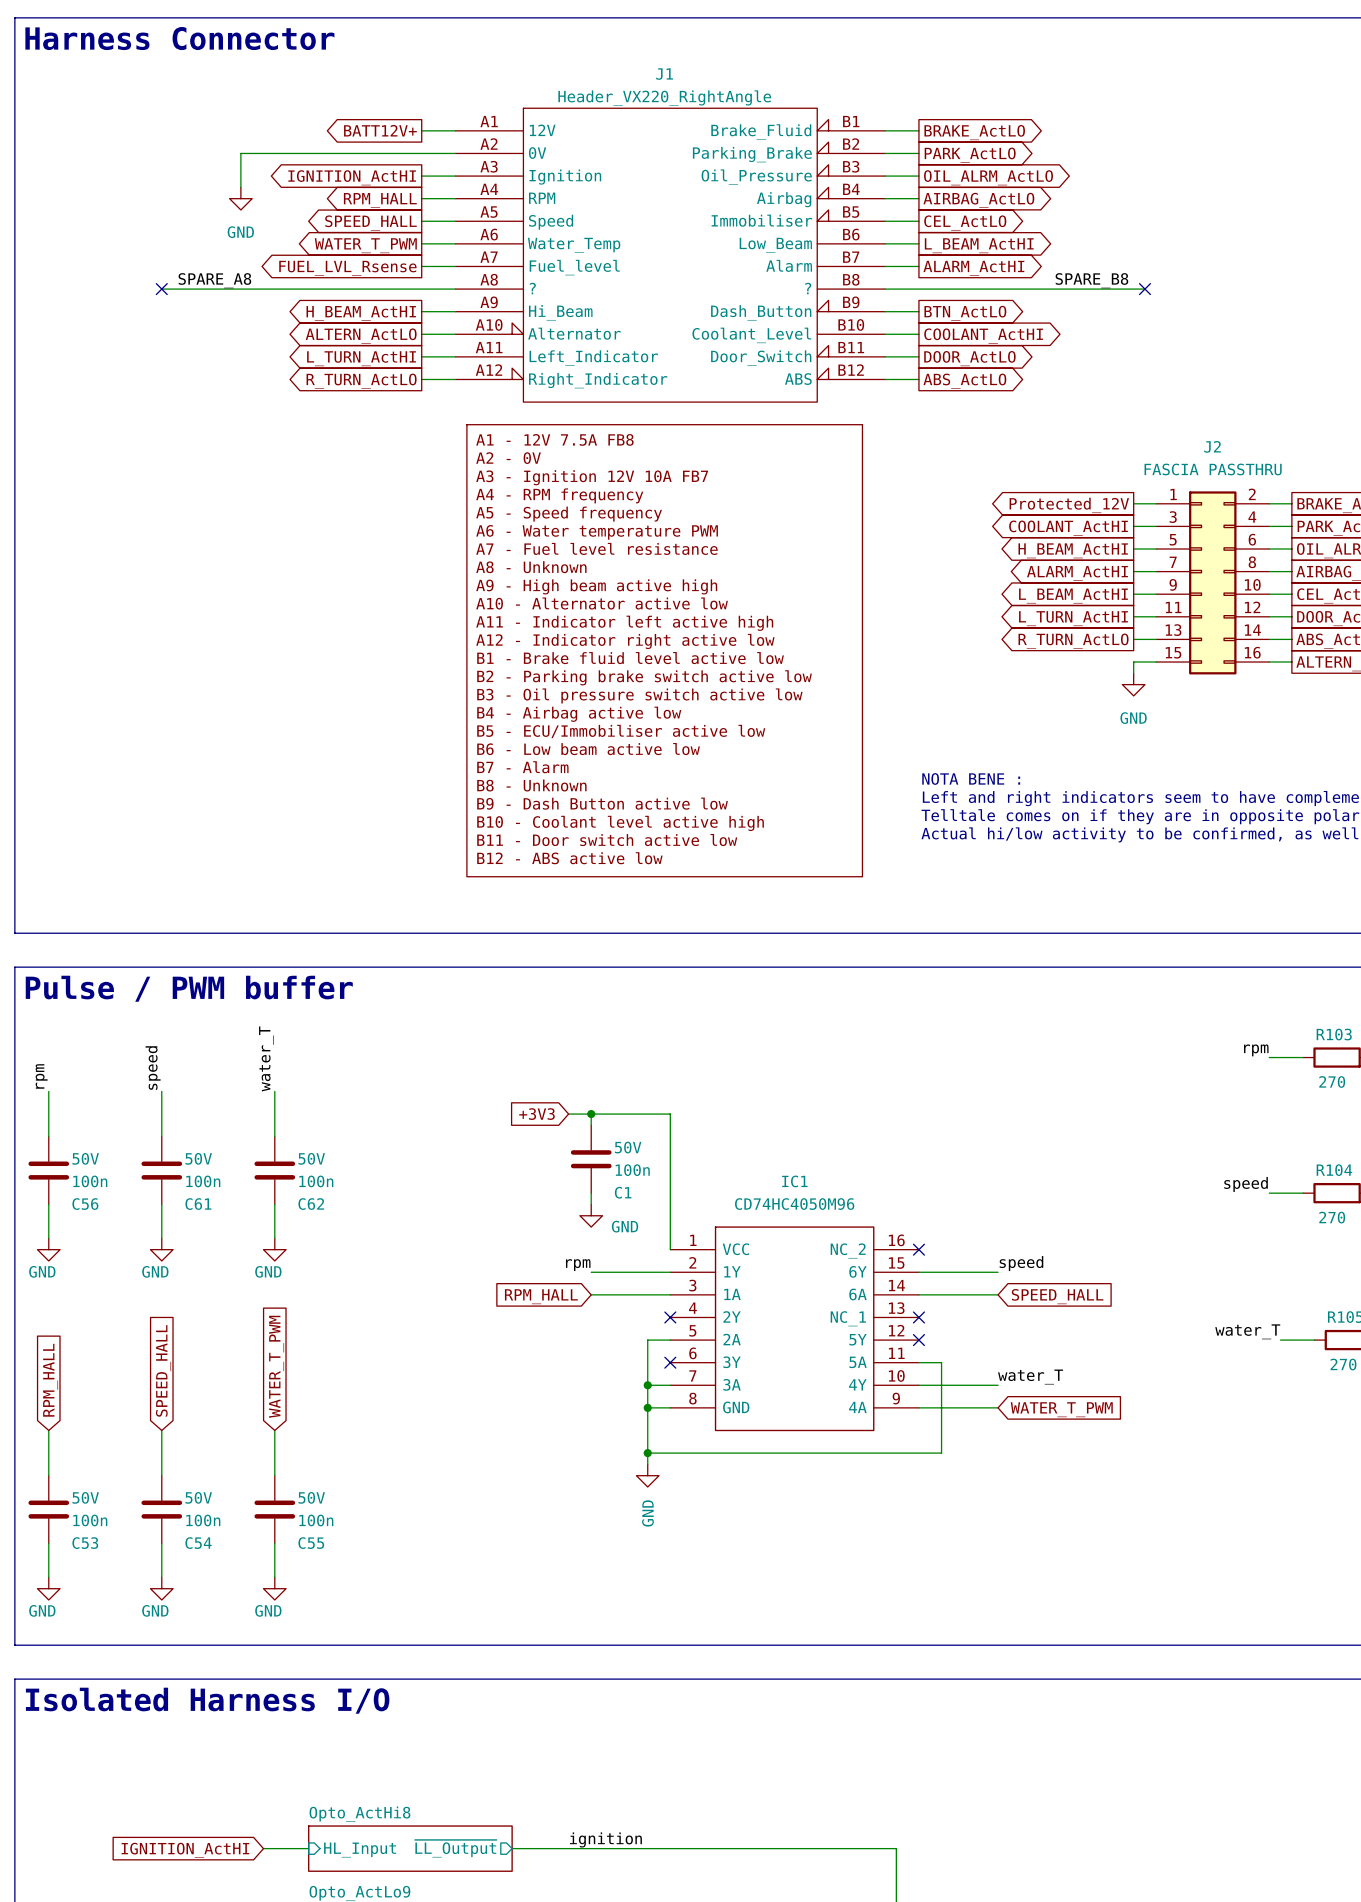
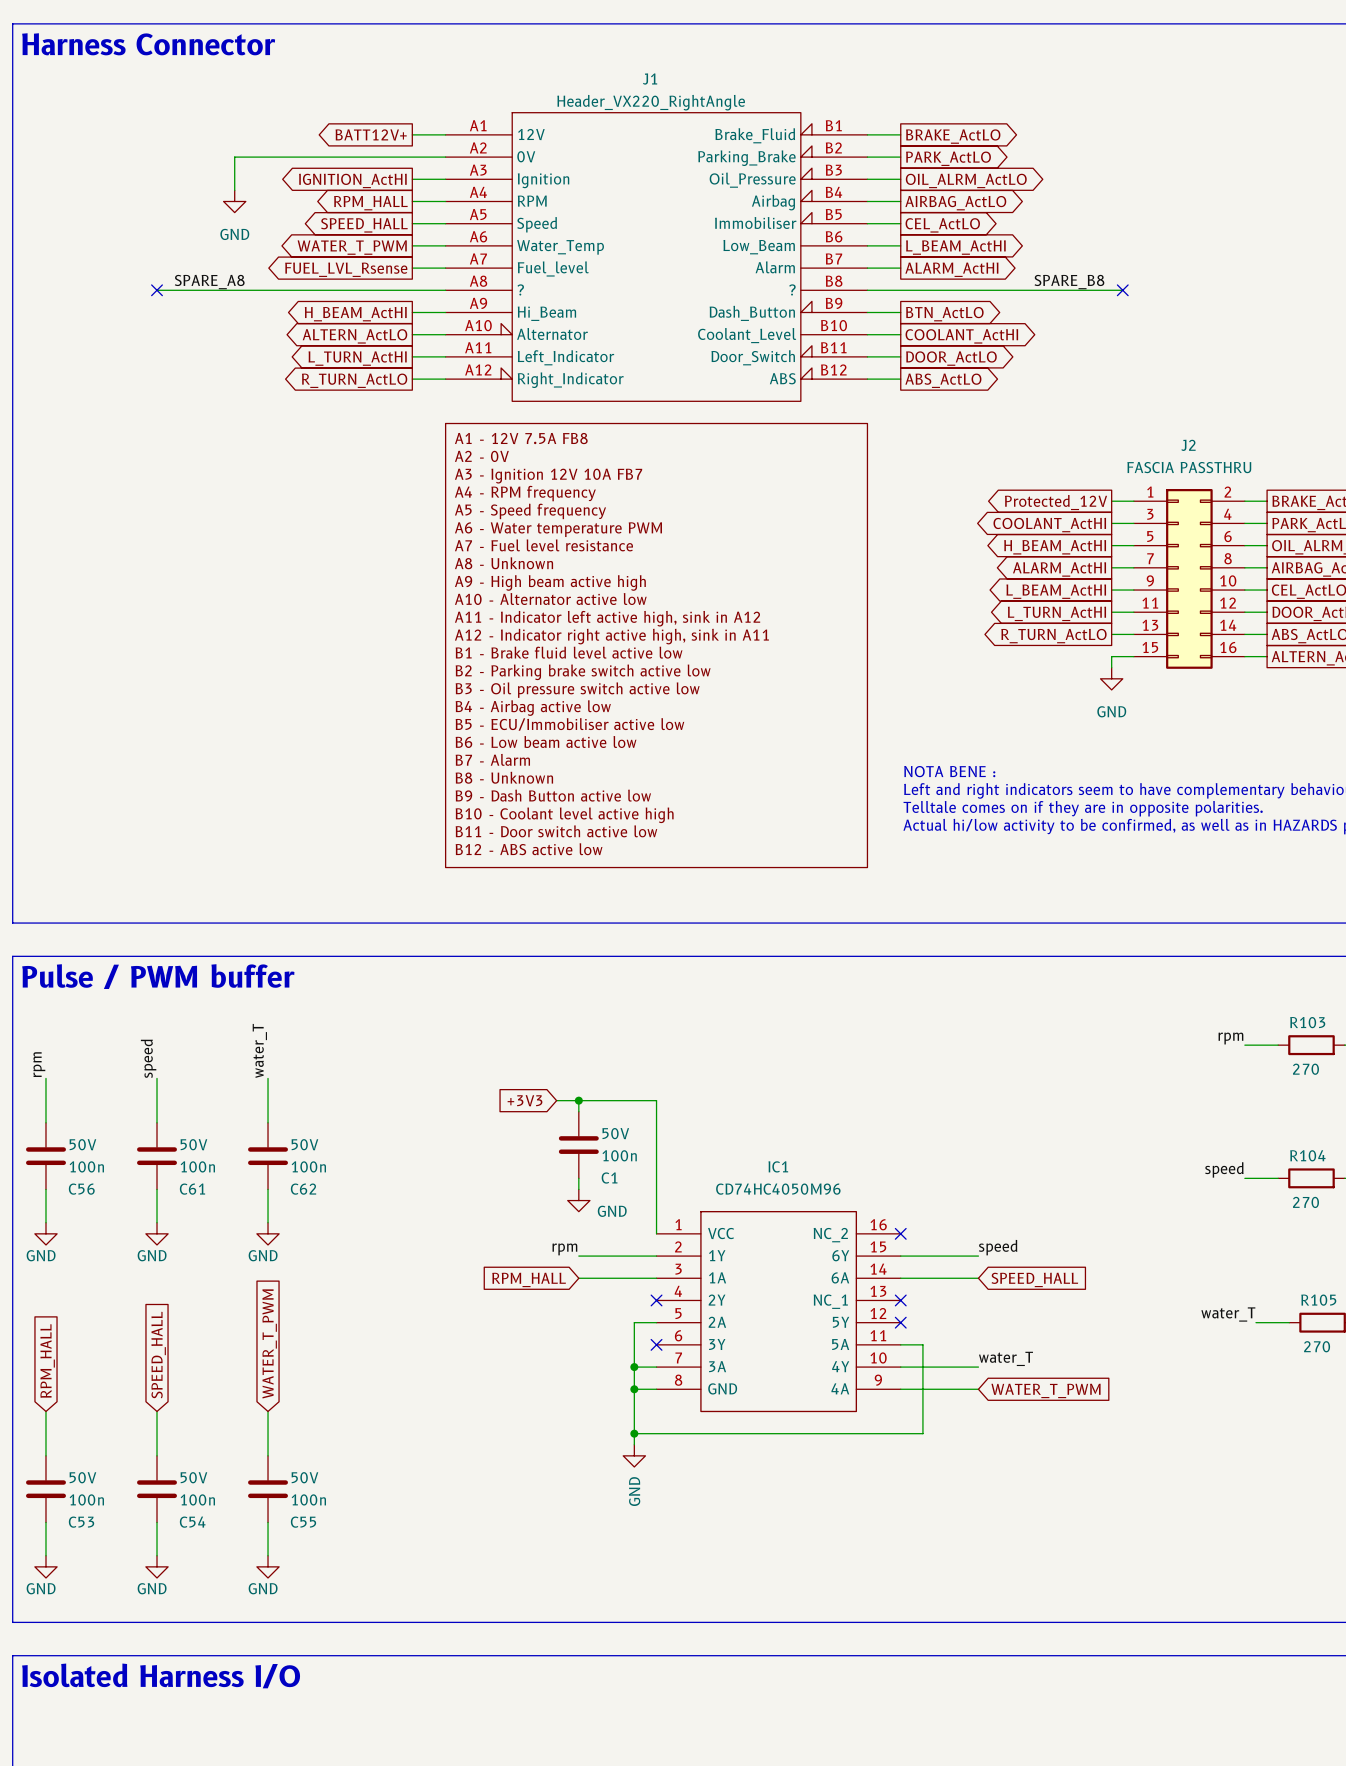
J1 symbol: [455, 108, 886, 877] -> [445, 112, 868, 868]

